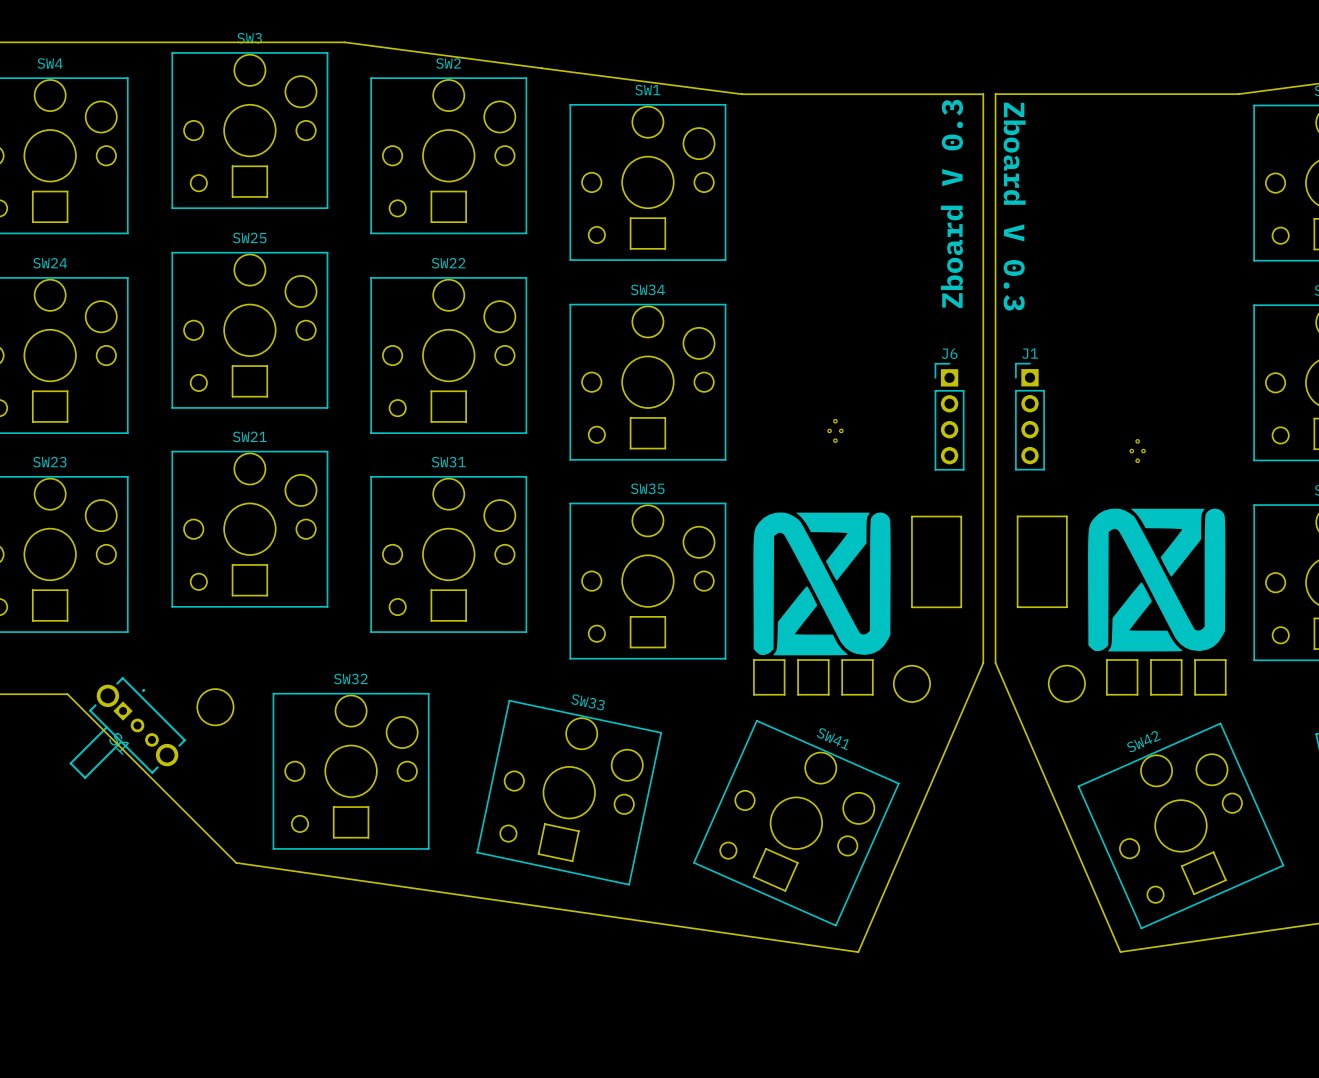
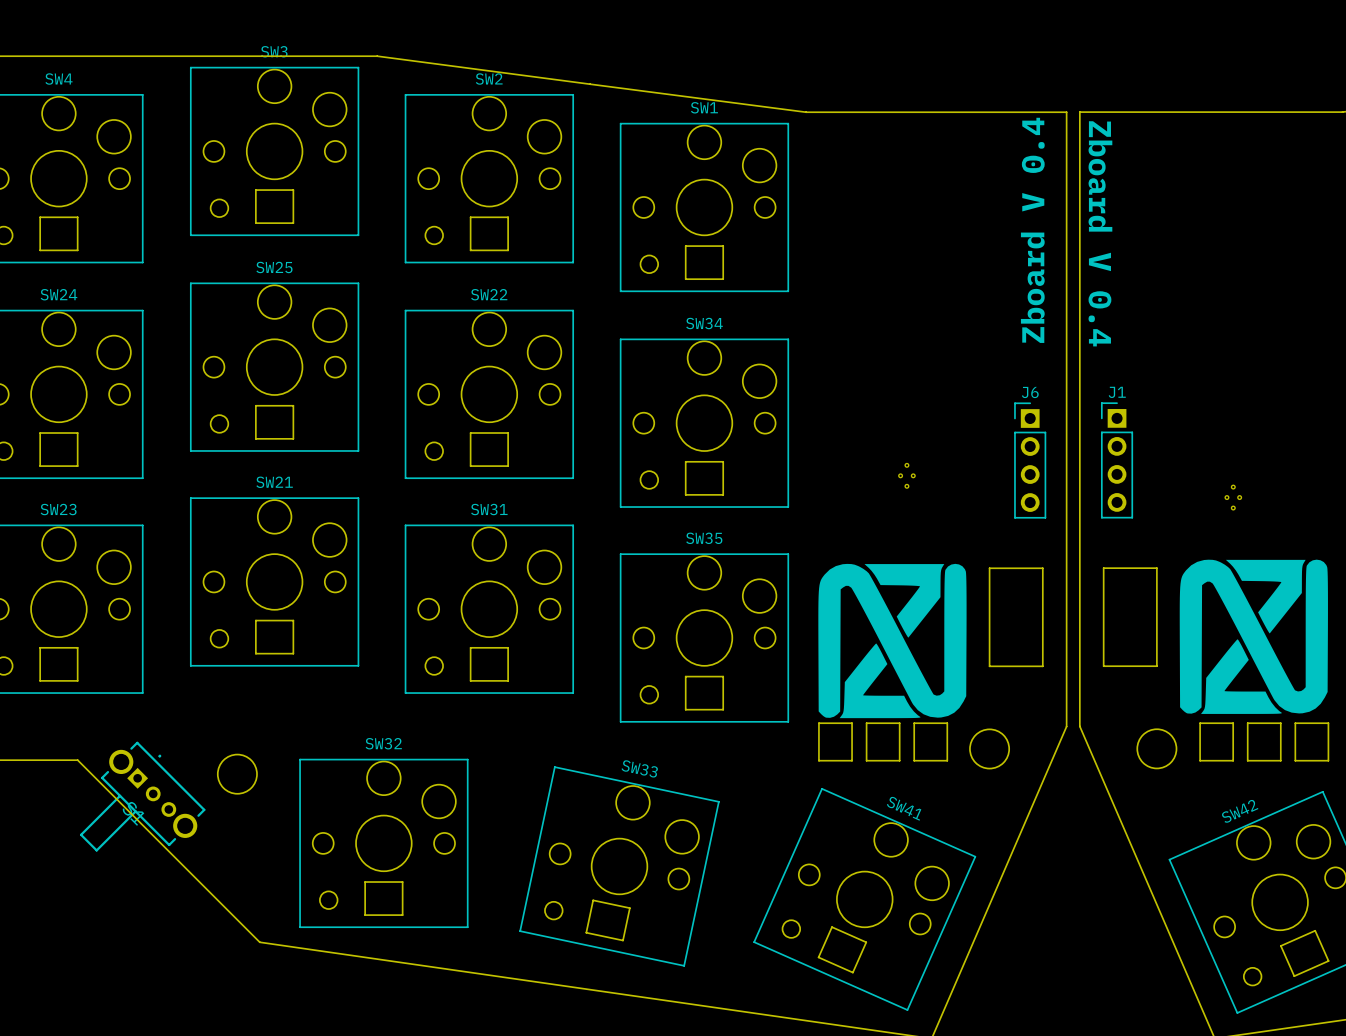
text: Zboard V 0.3 (951, 203) -> Zboard V 0.4 (1032, 230)
text: Zboard V 0.3 (1014, 206) -> Zboard V 0.4 (1100, 233)

